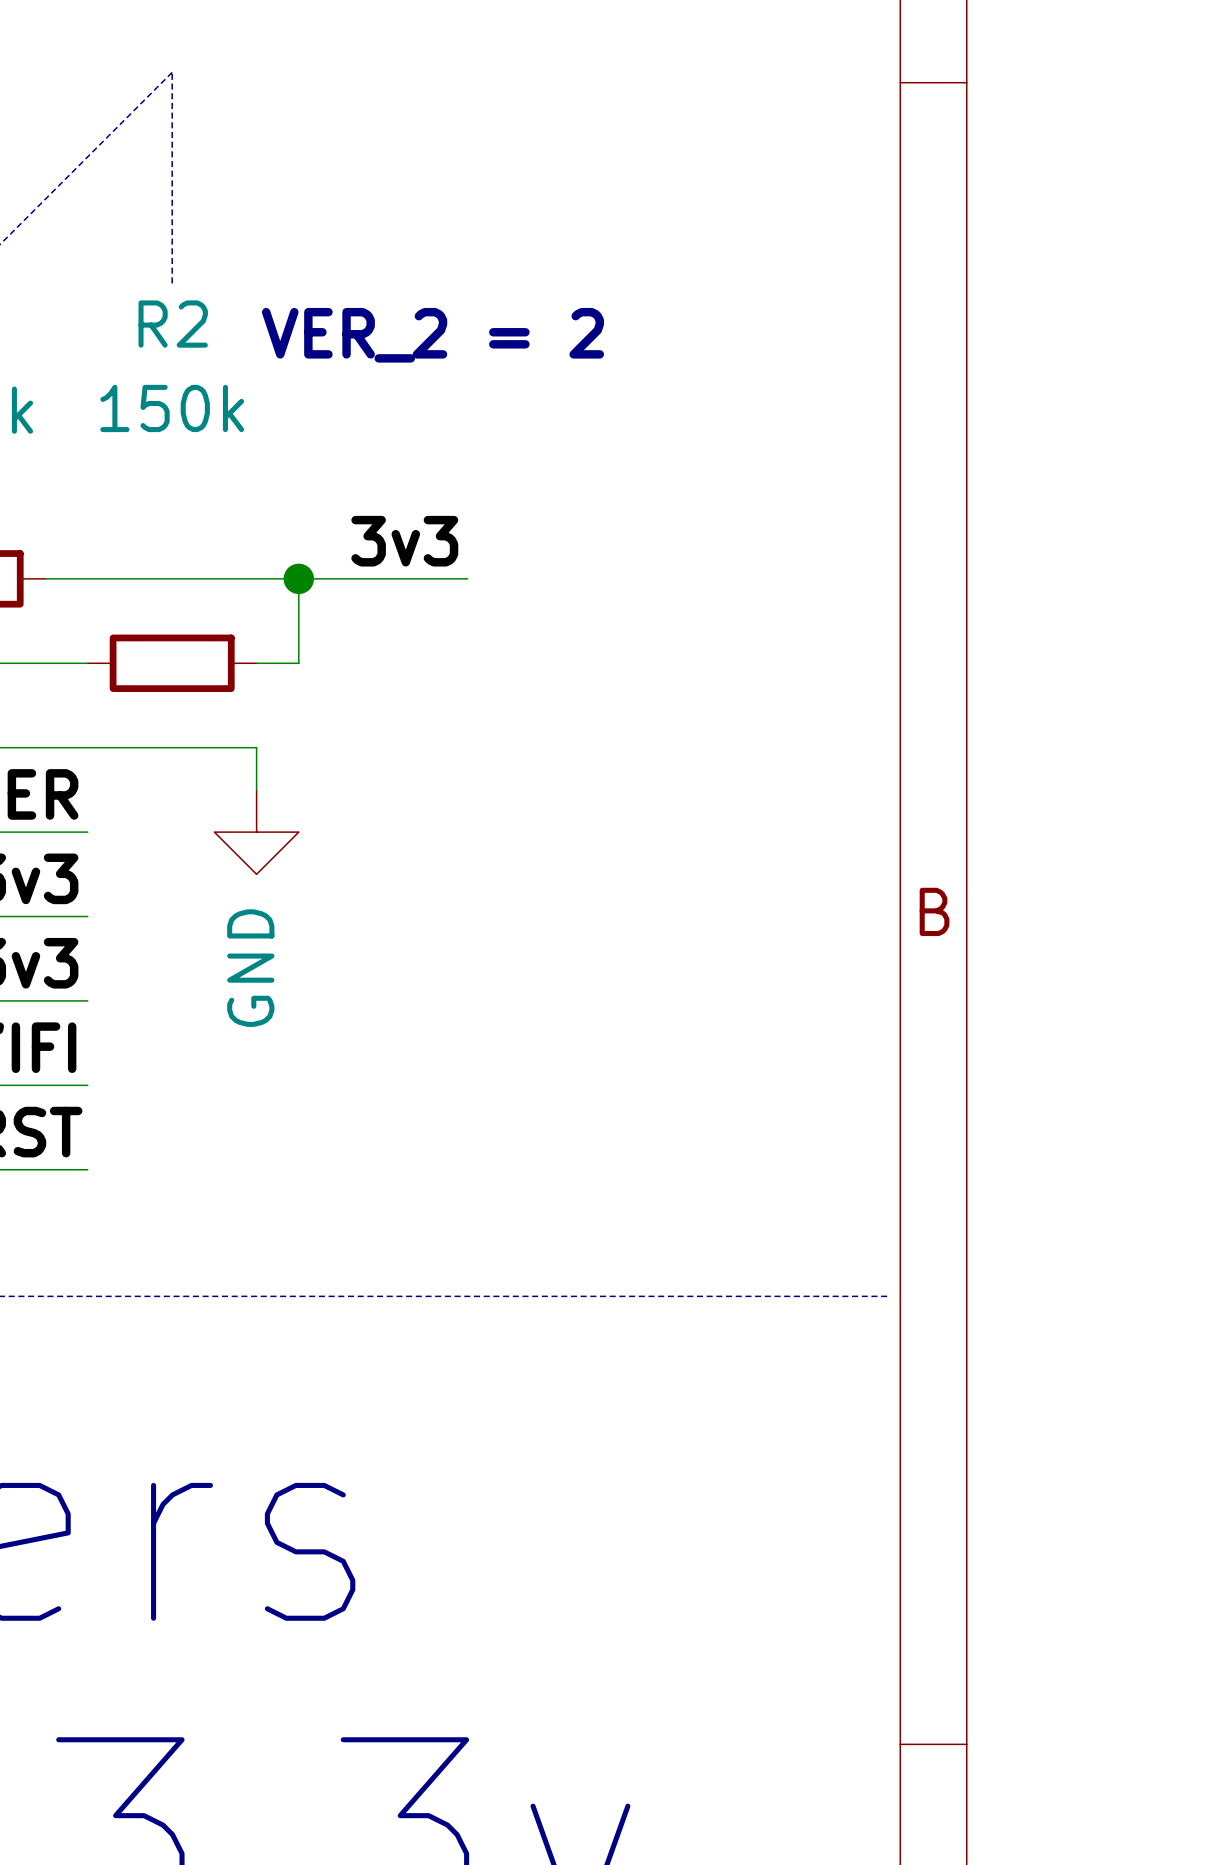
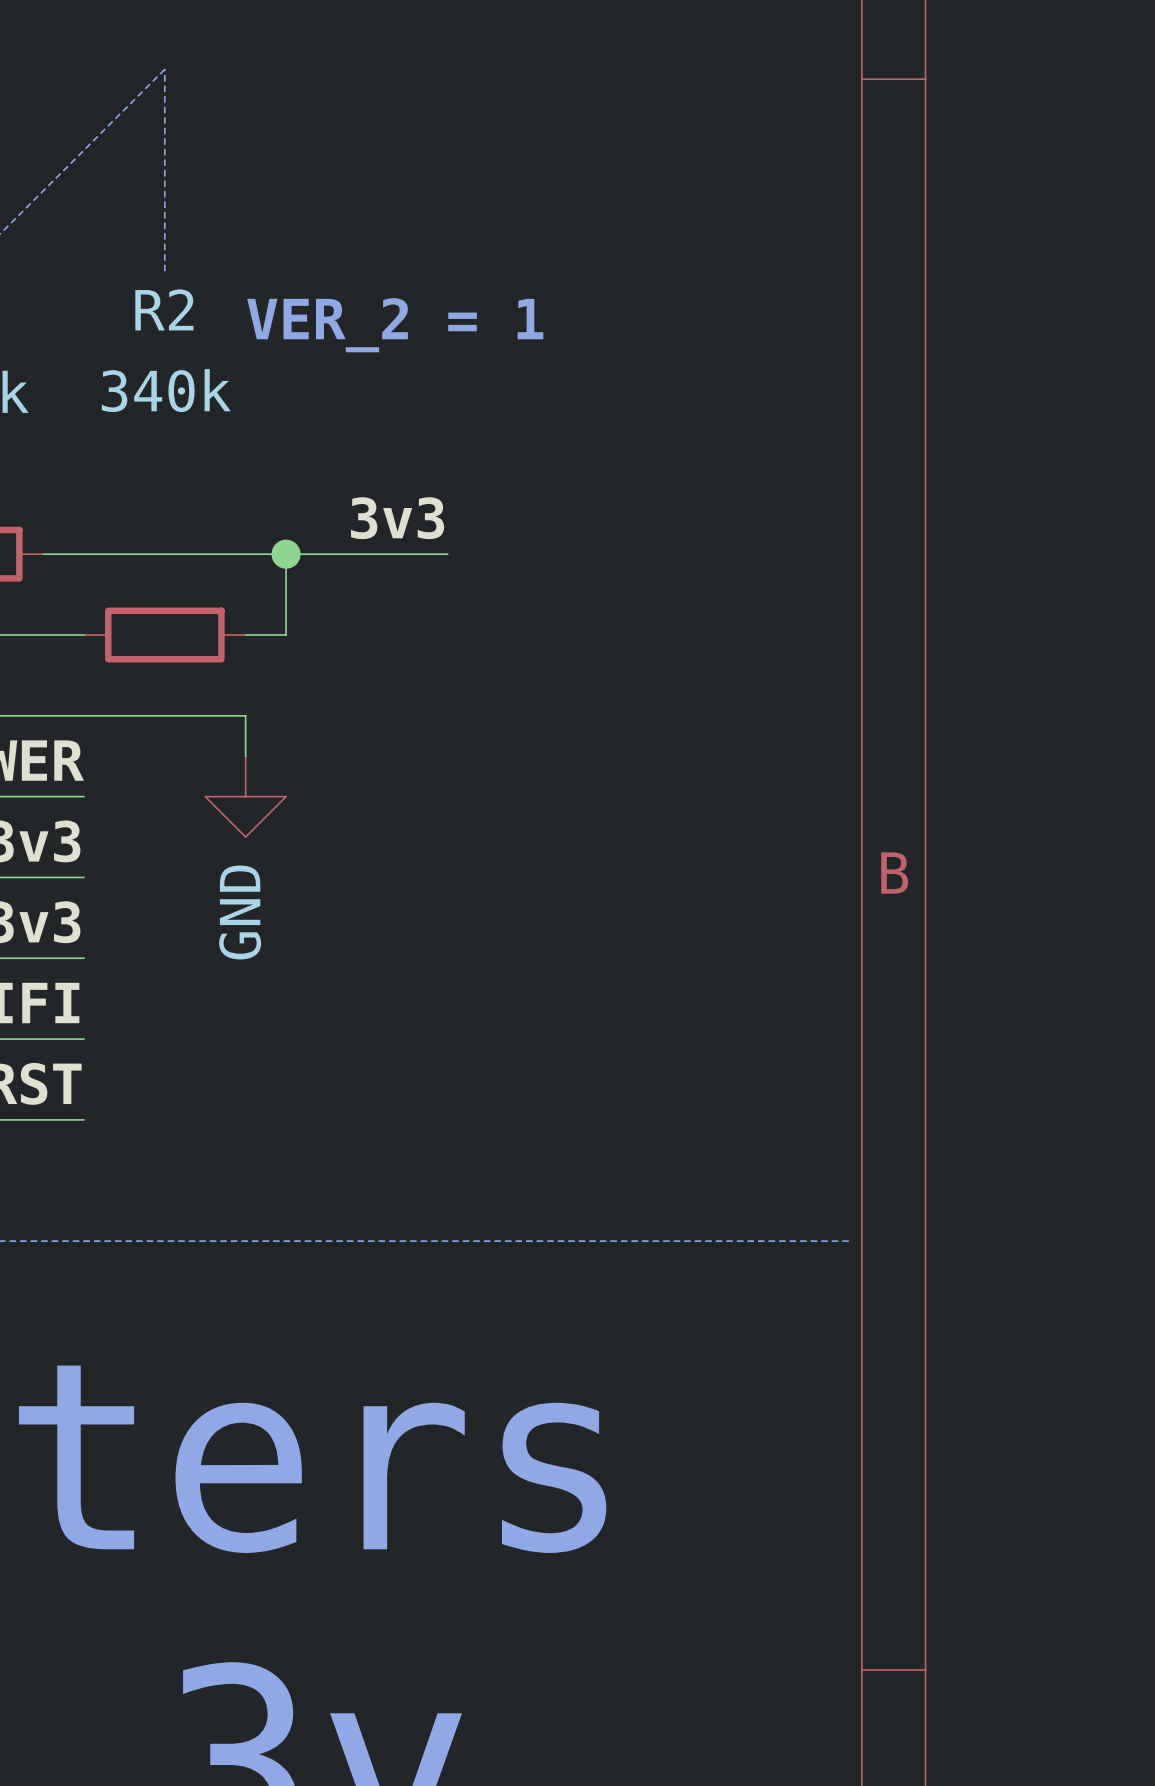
text: VER_2 = 2 (432, 335) -> VER_2 = 1 (395, 325)
R2 value: 150k (172, 408) -> 340k (166, 390)

